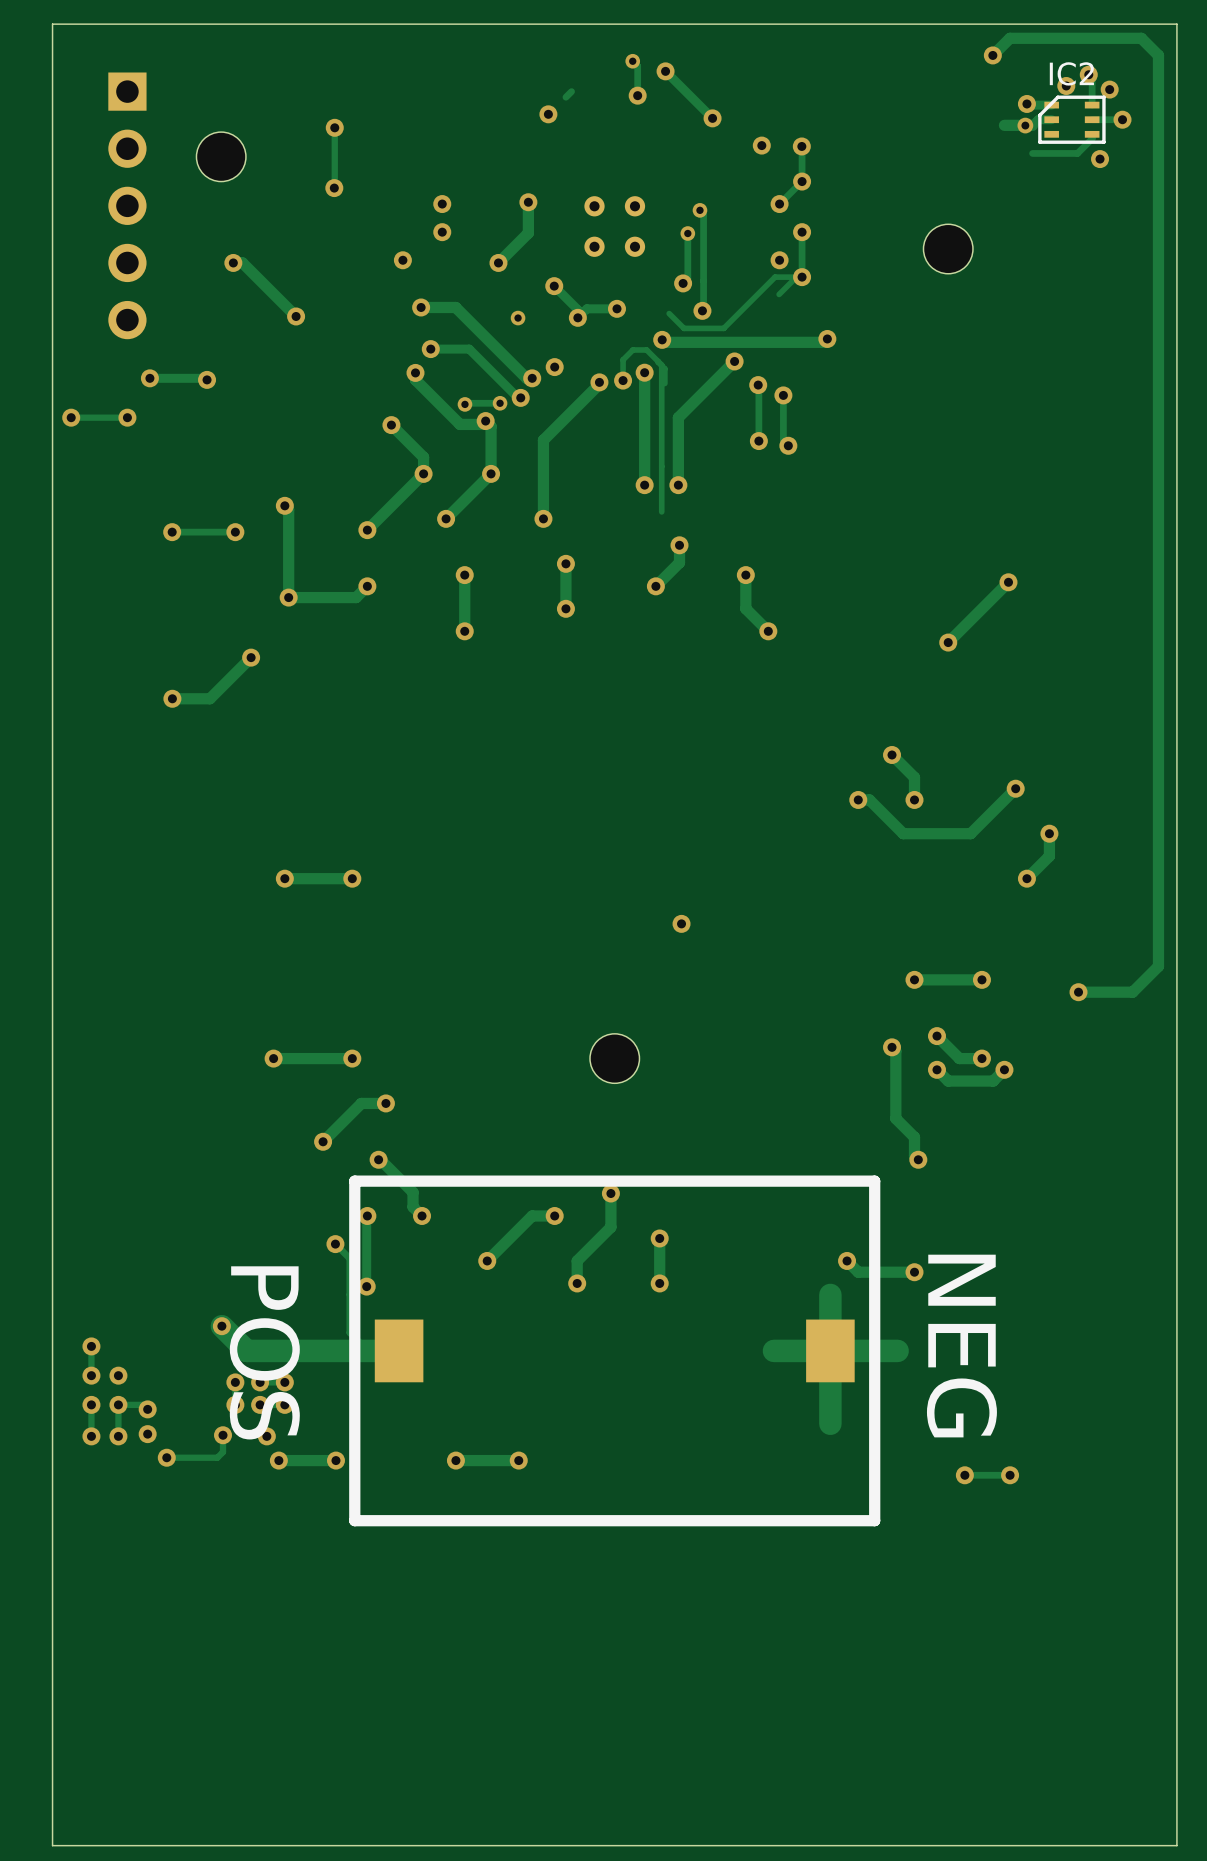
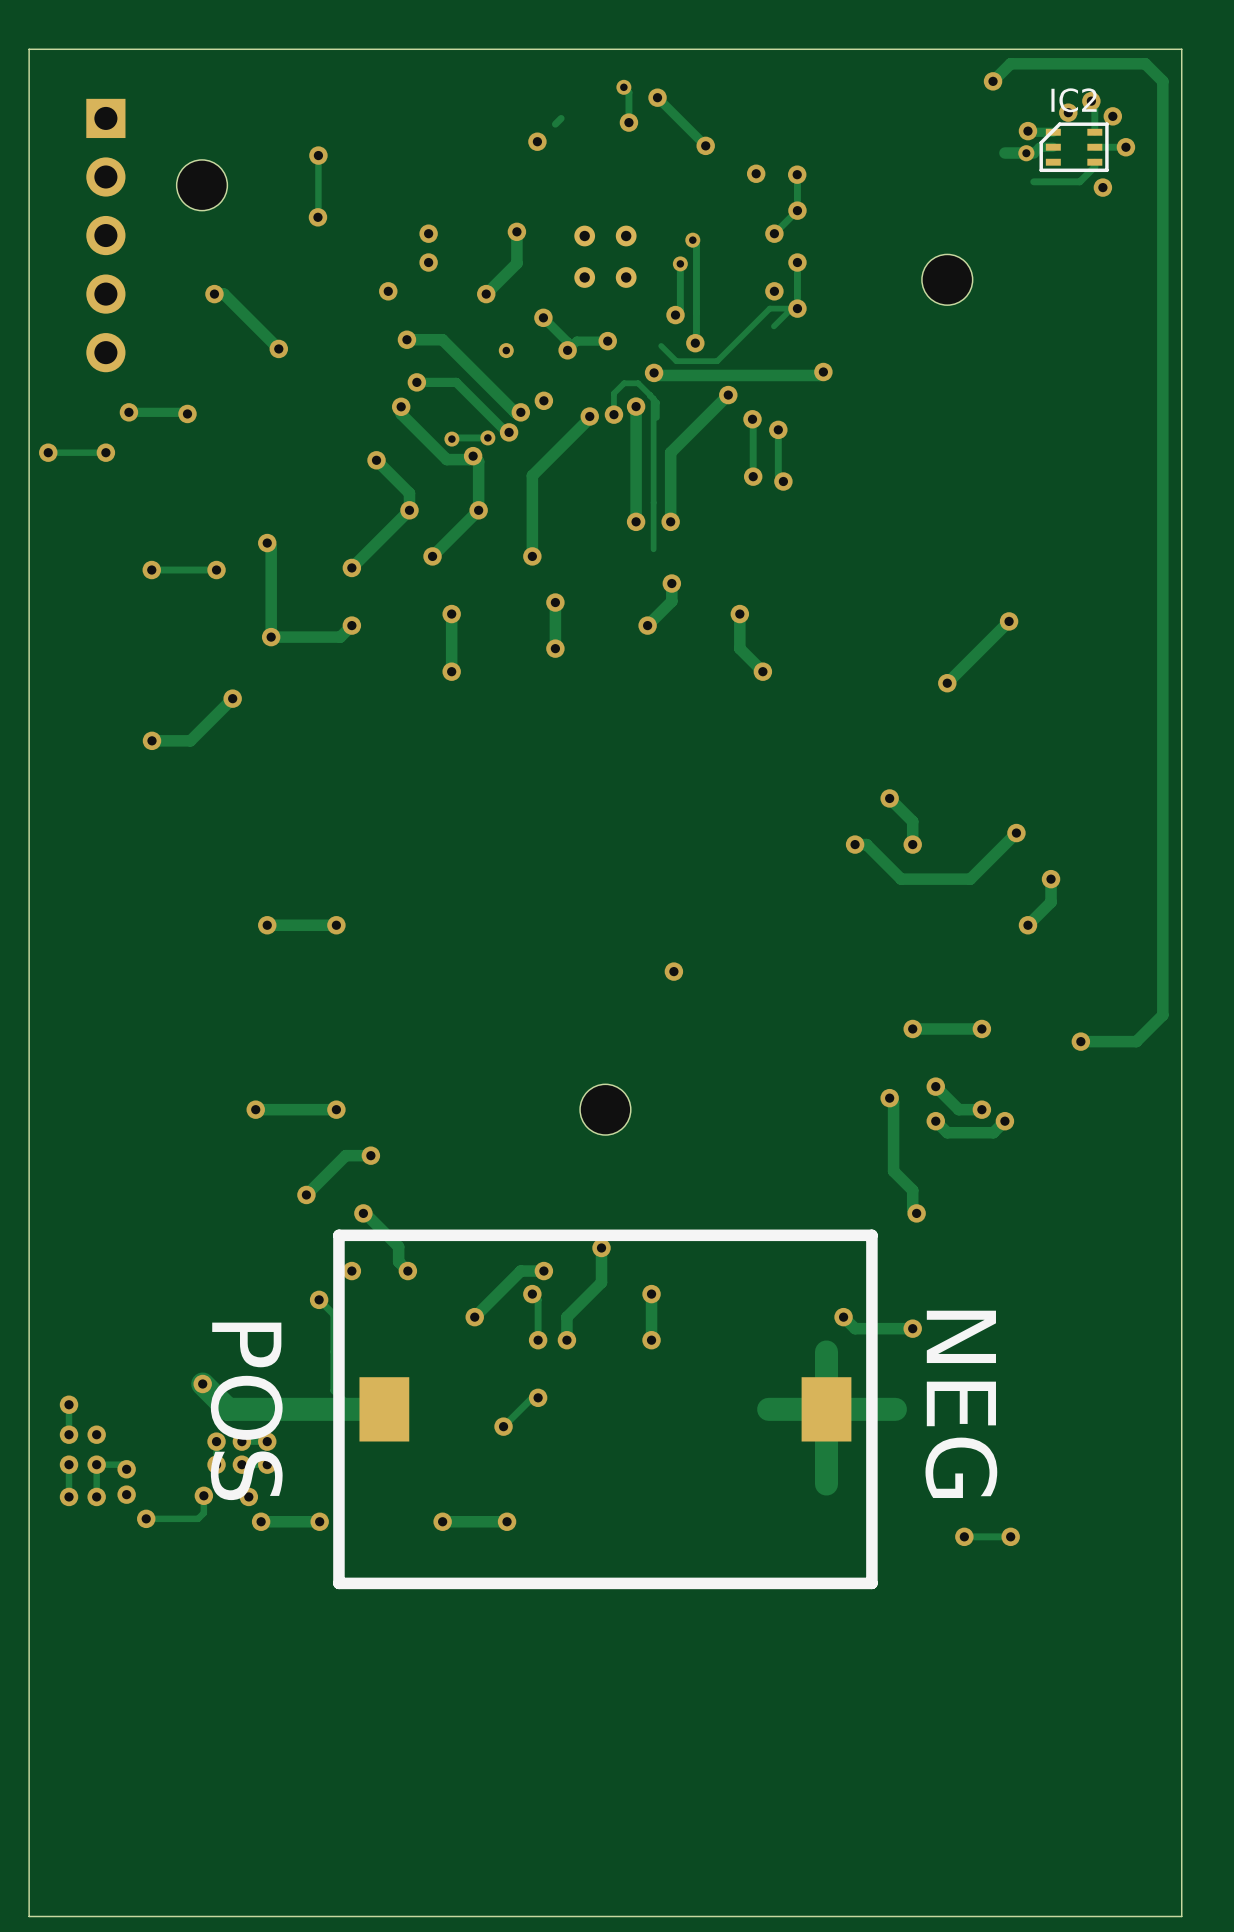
track: (366, 1216) (366, 1286) -> none
track: none -> (532, 1294) (538, 1299) (538, 1340)
via: none -> (532, 1294)
via: none -> (538, 1340)
via: (366, 1286) -> none
track: none -> (538, 1397) (532, 1397) (503, 1426)
via: none -> (538, 1397)
via: none -> (503, 1426)

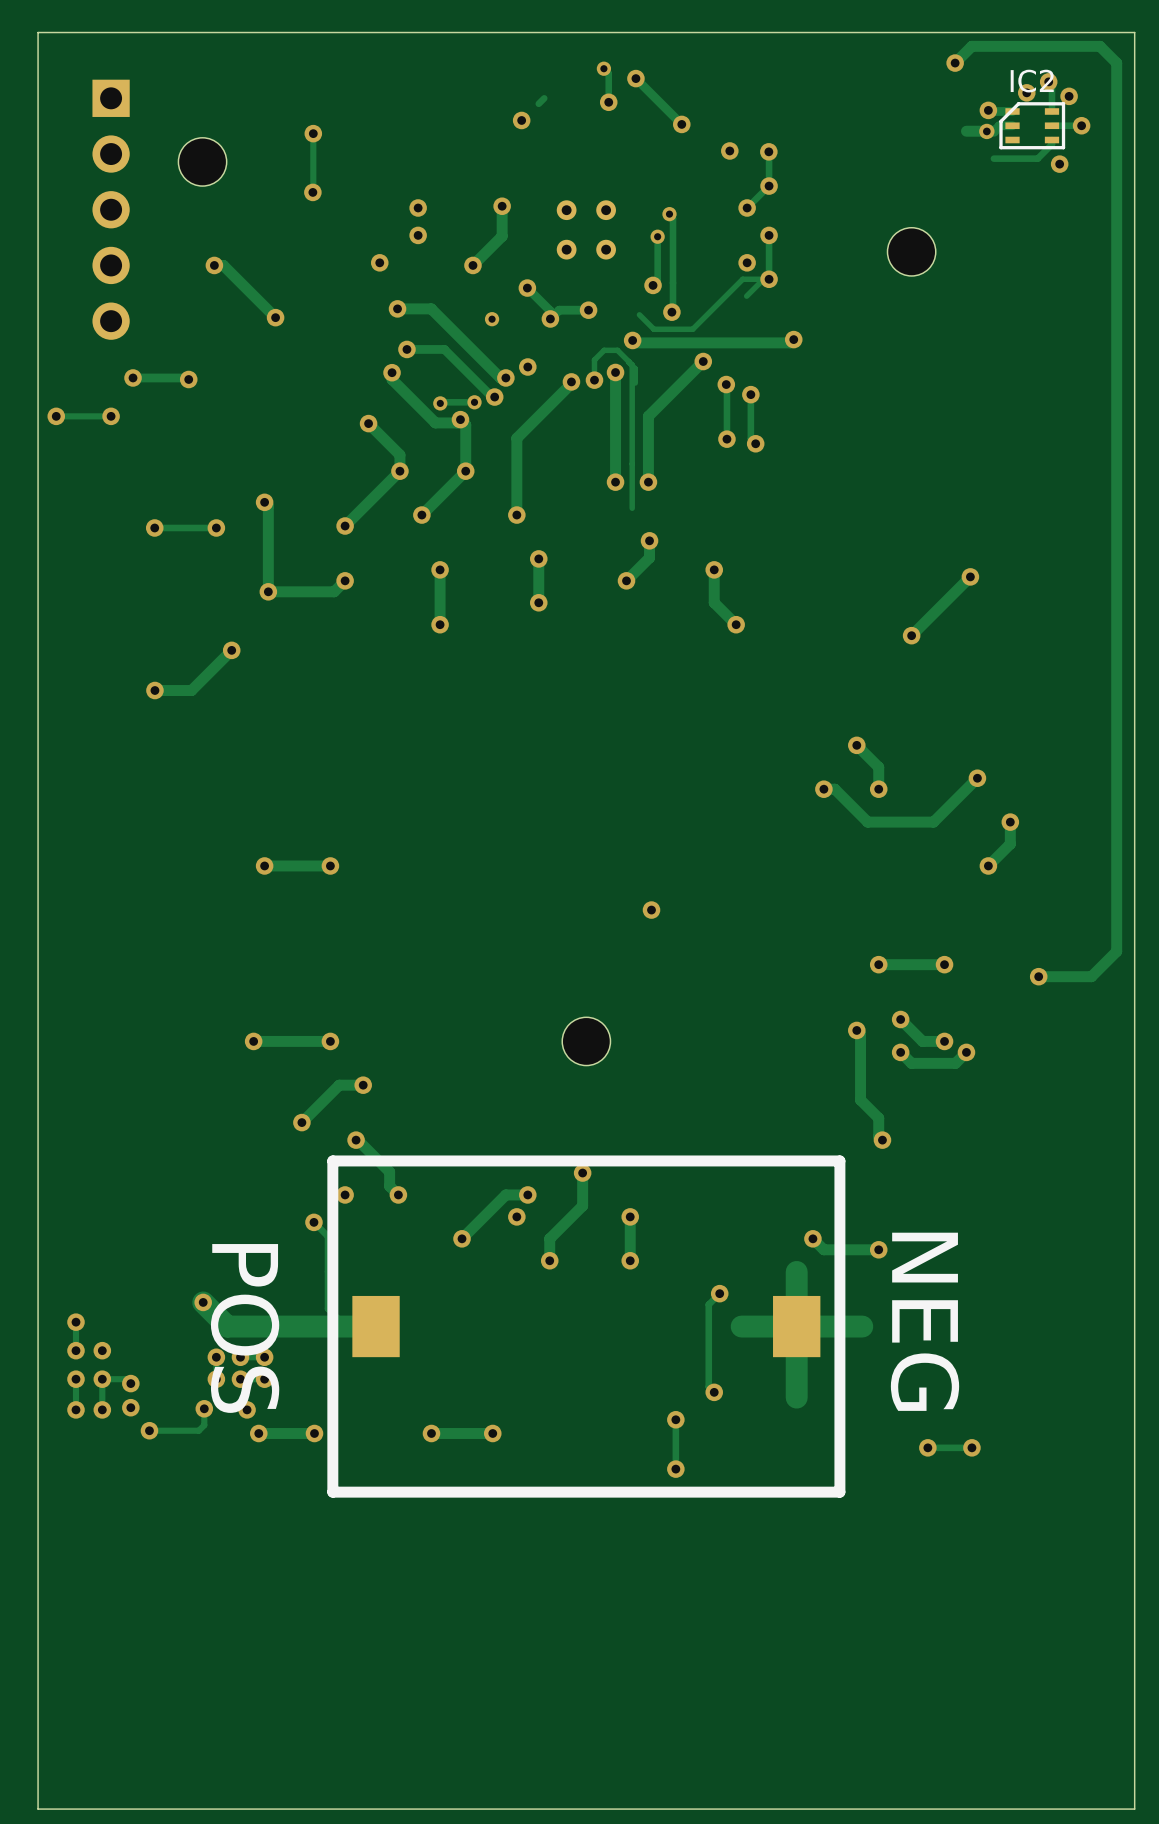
track: (532, 1294) (538, 1299) (538, 1340) -> none
via: (538, 1340) -> none
track: none -> (719, 1293) (708, 1304) (708, 1386) (714, 1392)
via: none -> (719, 1293)
track: (538, 1397) (532, 1397) (503, 1426) -> none
via: (538, 1397) -> none
via: (503, 1426) -> none
via: none -> (714, 1392)
track: none -> (675, 1419) (675, 1469)
via: none -> (675, 1419)
via: none -> (675, 1469)

